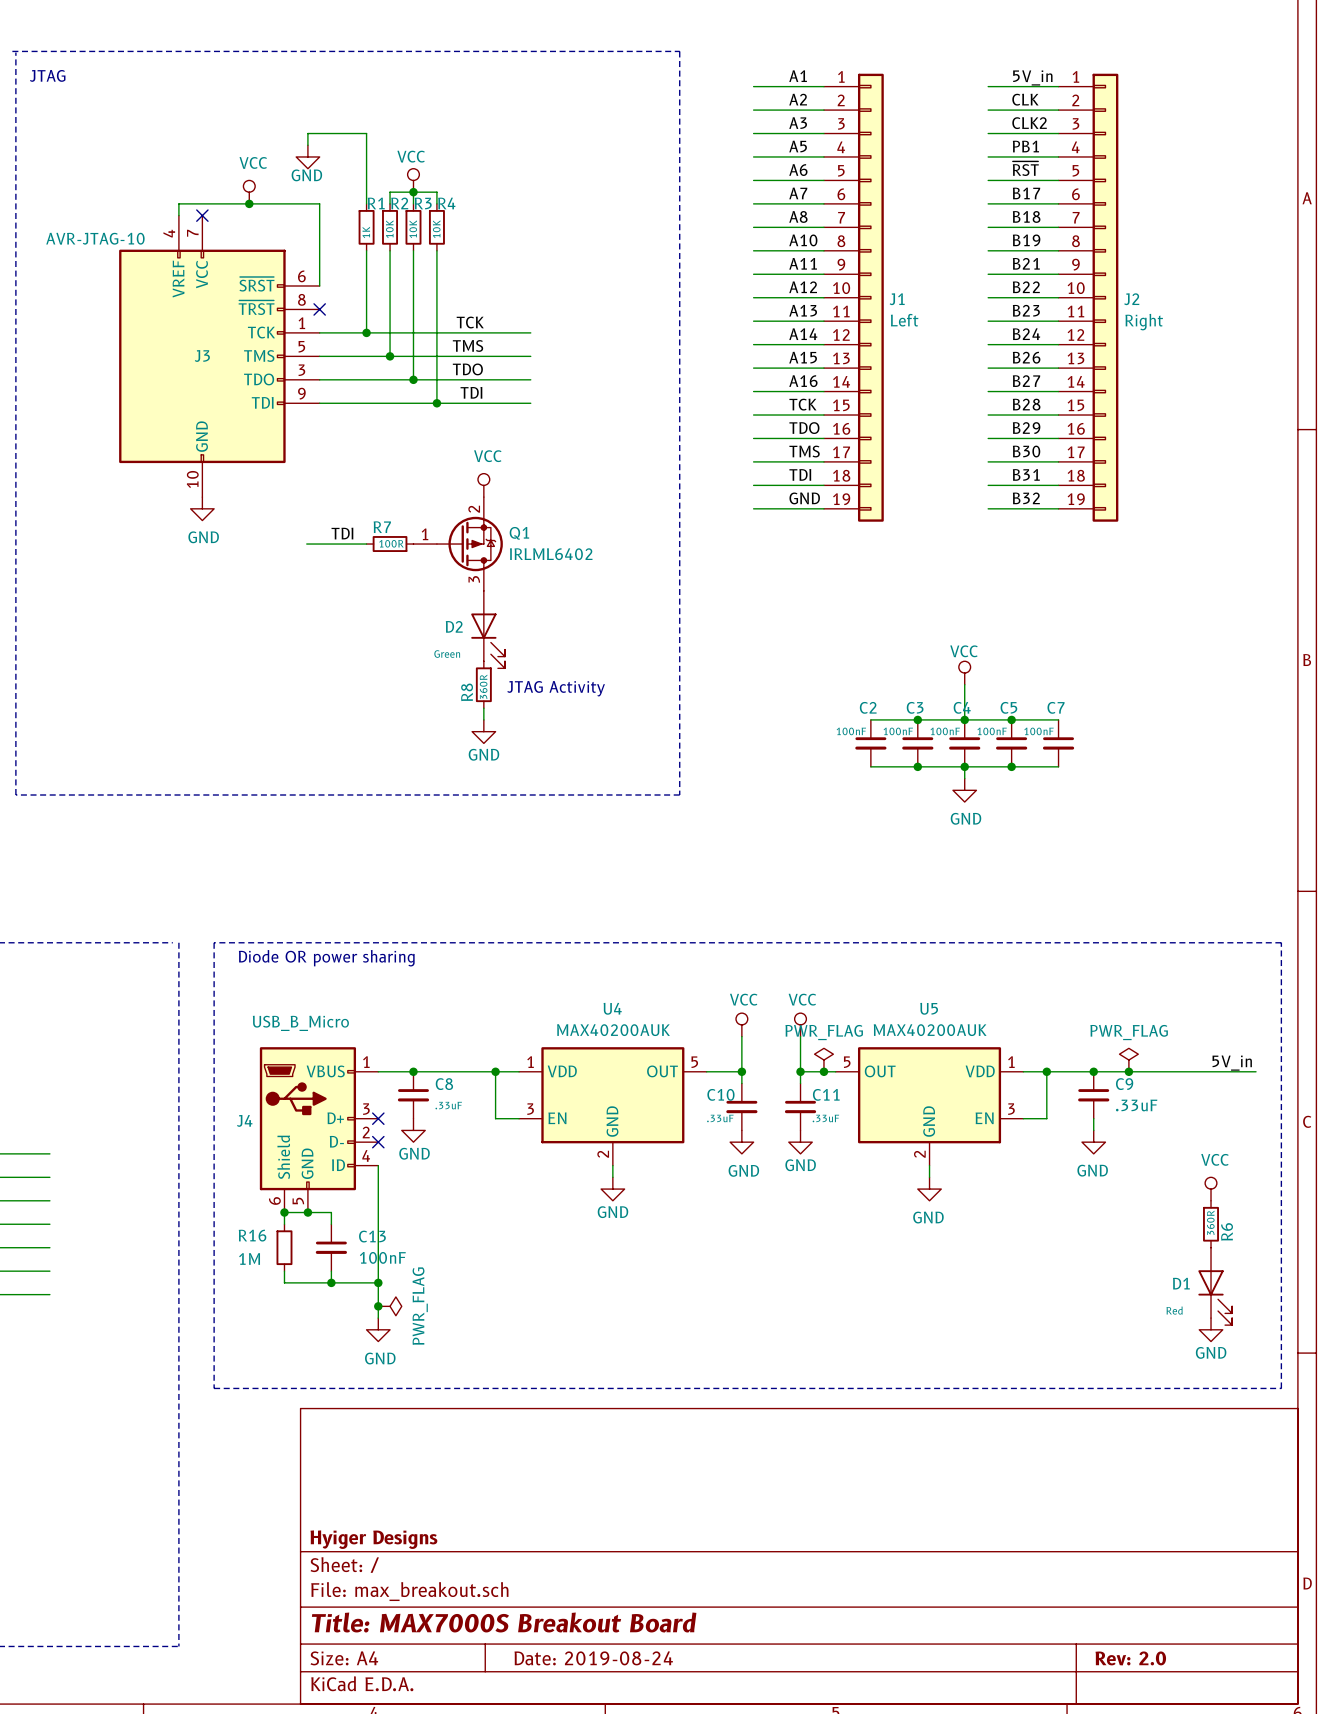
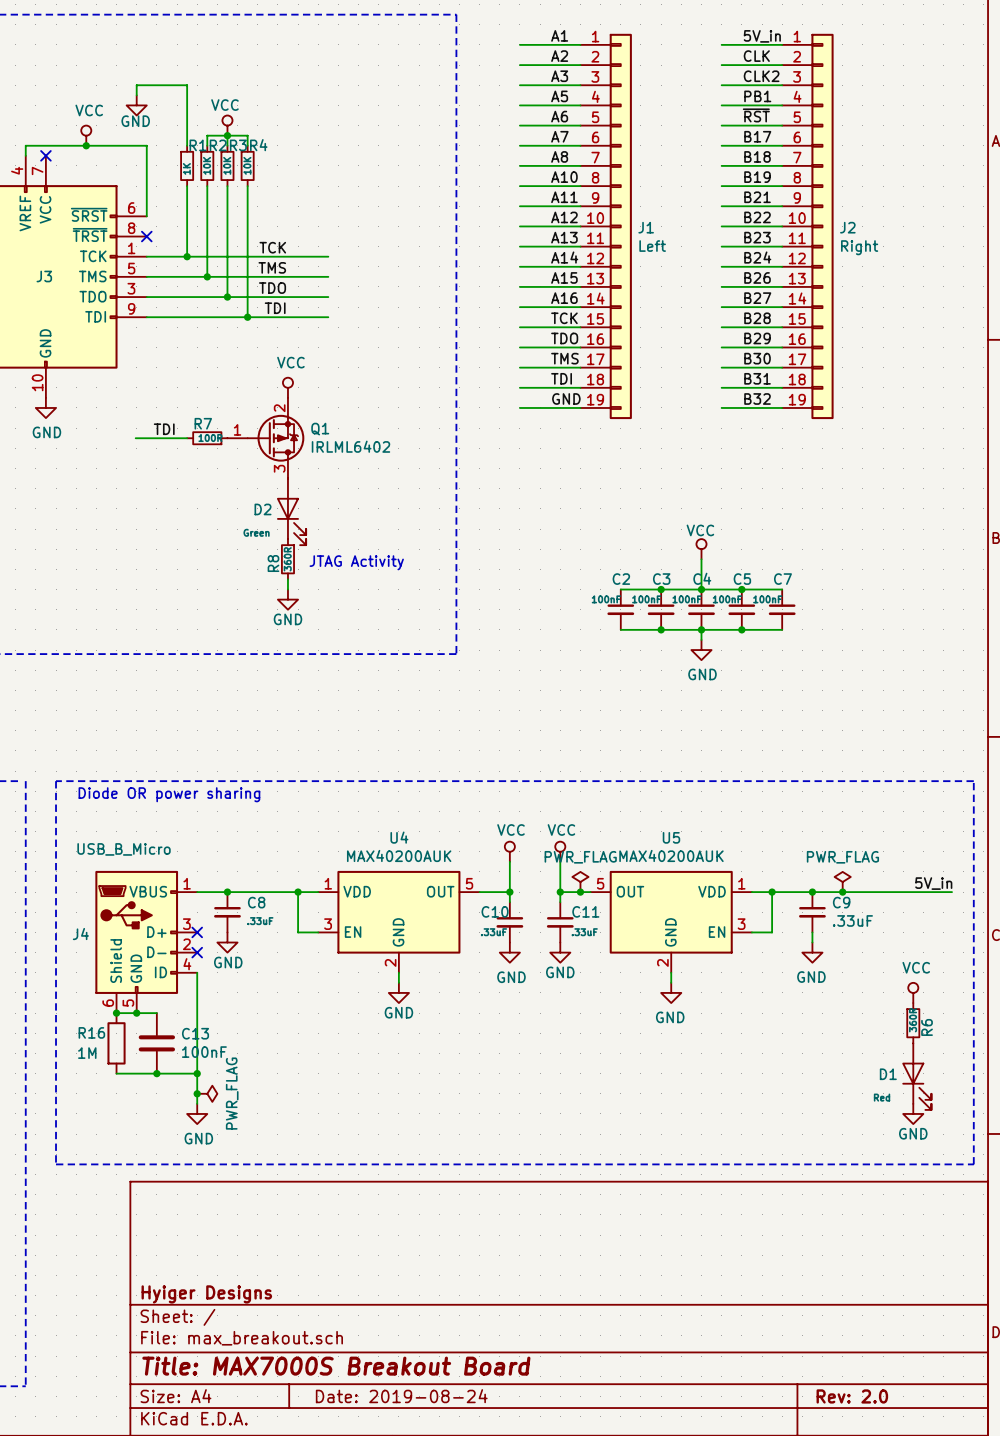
R16 symbol: [276, 1224, 293, 1272] -> [107, 1013, 126, 1074]
C13 symbol: [315, 1224, 347, 1272] -> [138, 1013, 176, 1074]

